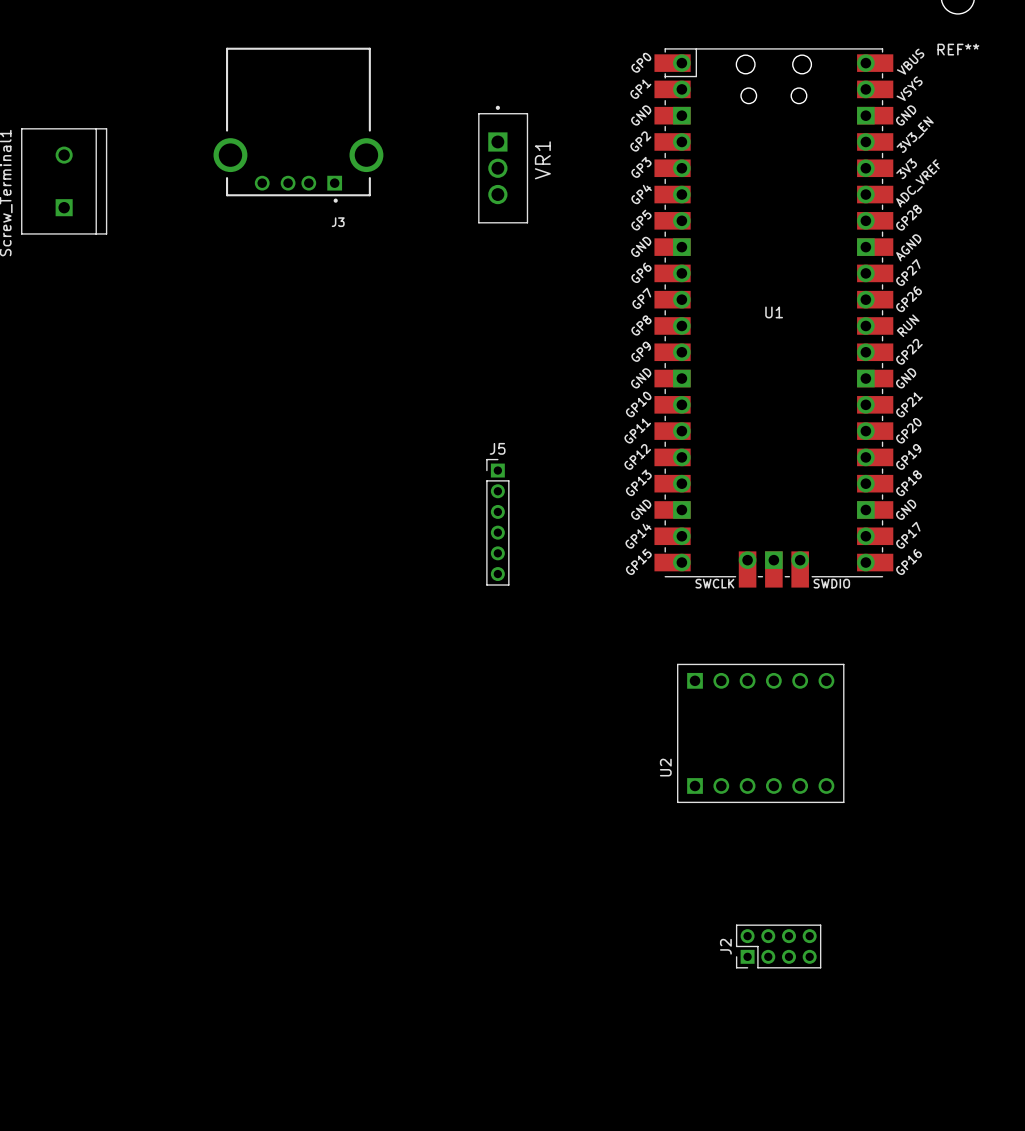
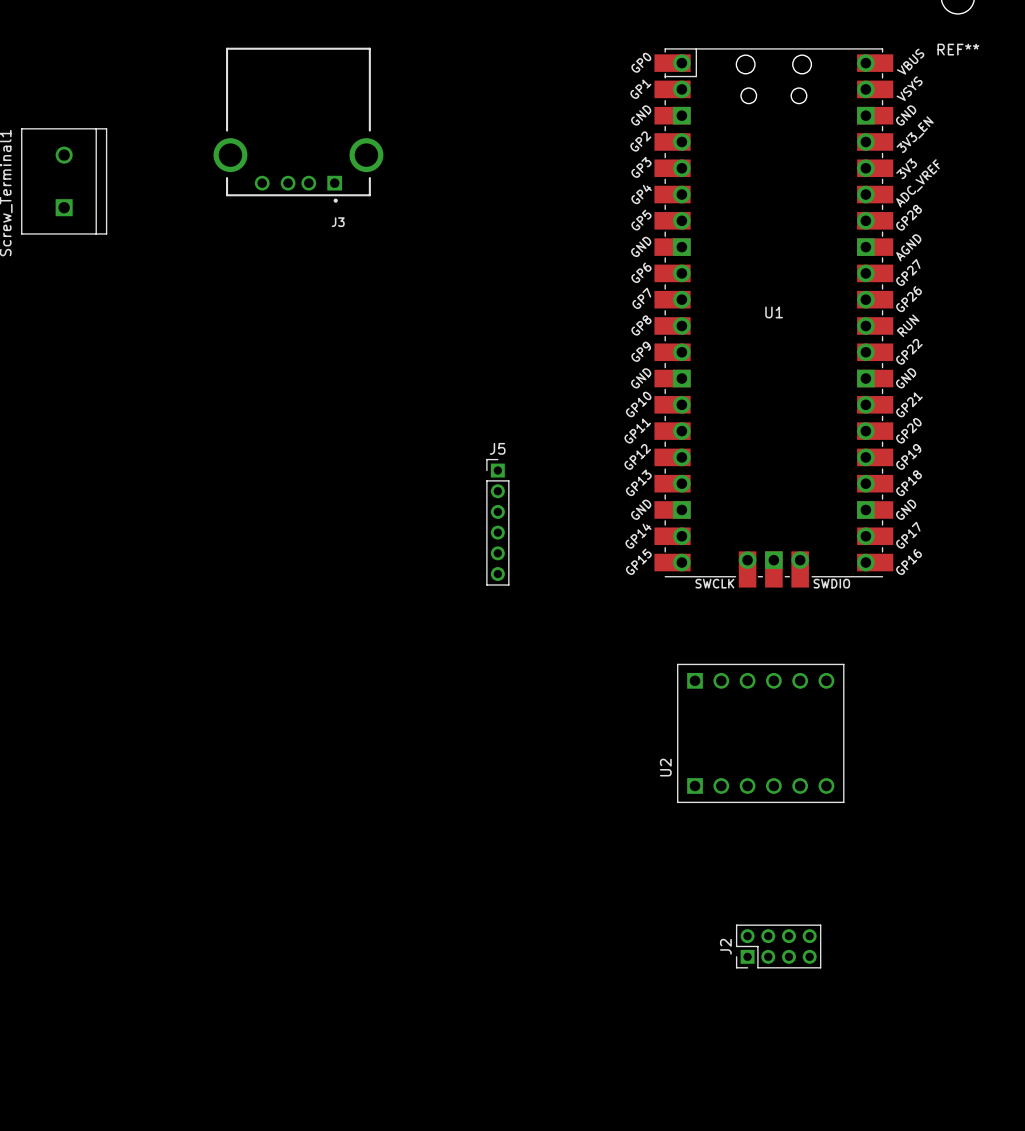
VR1: (503, 164) -> none

